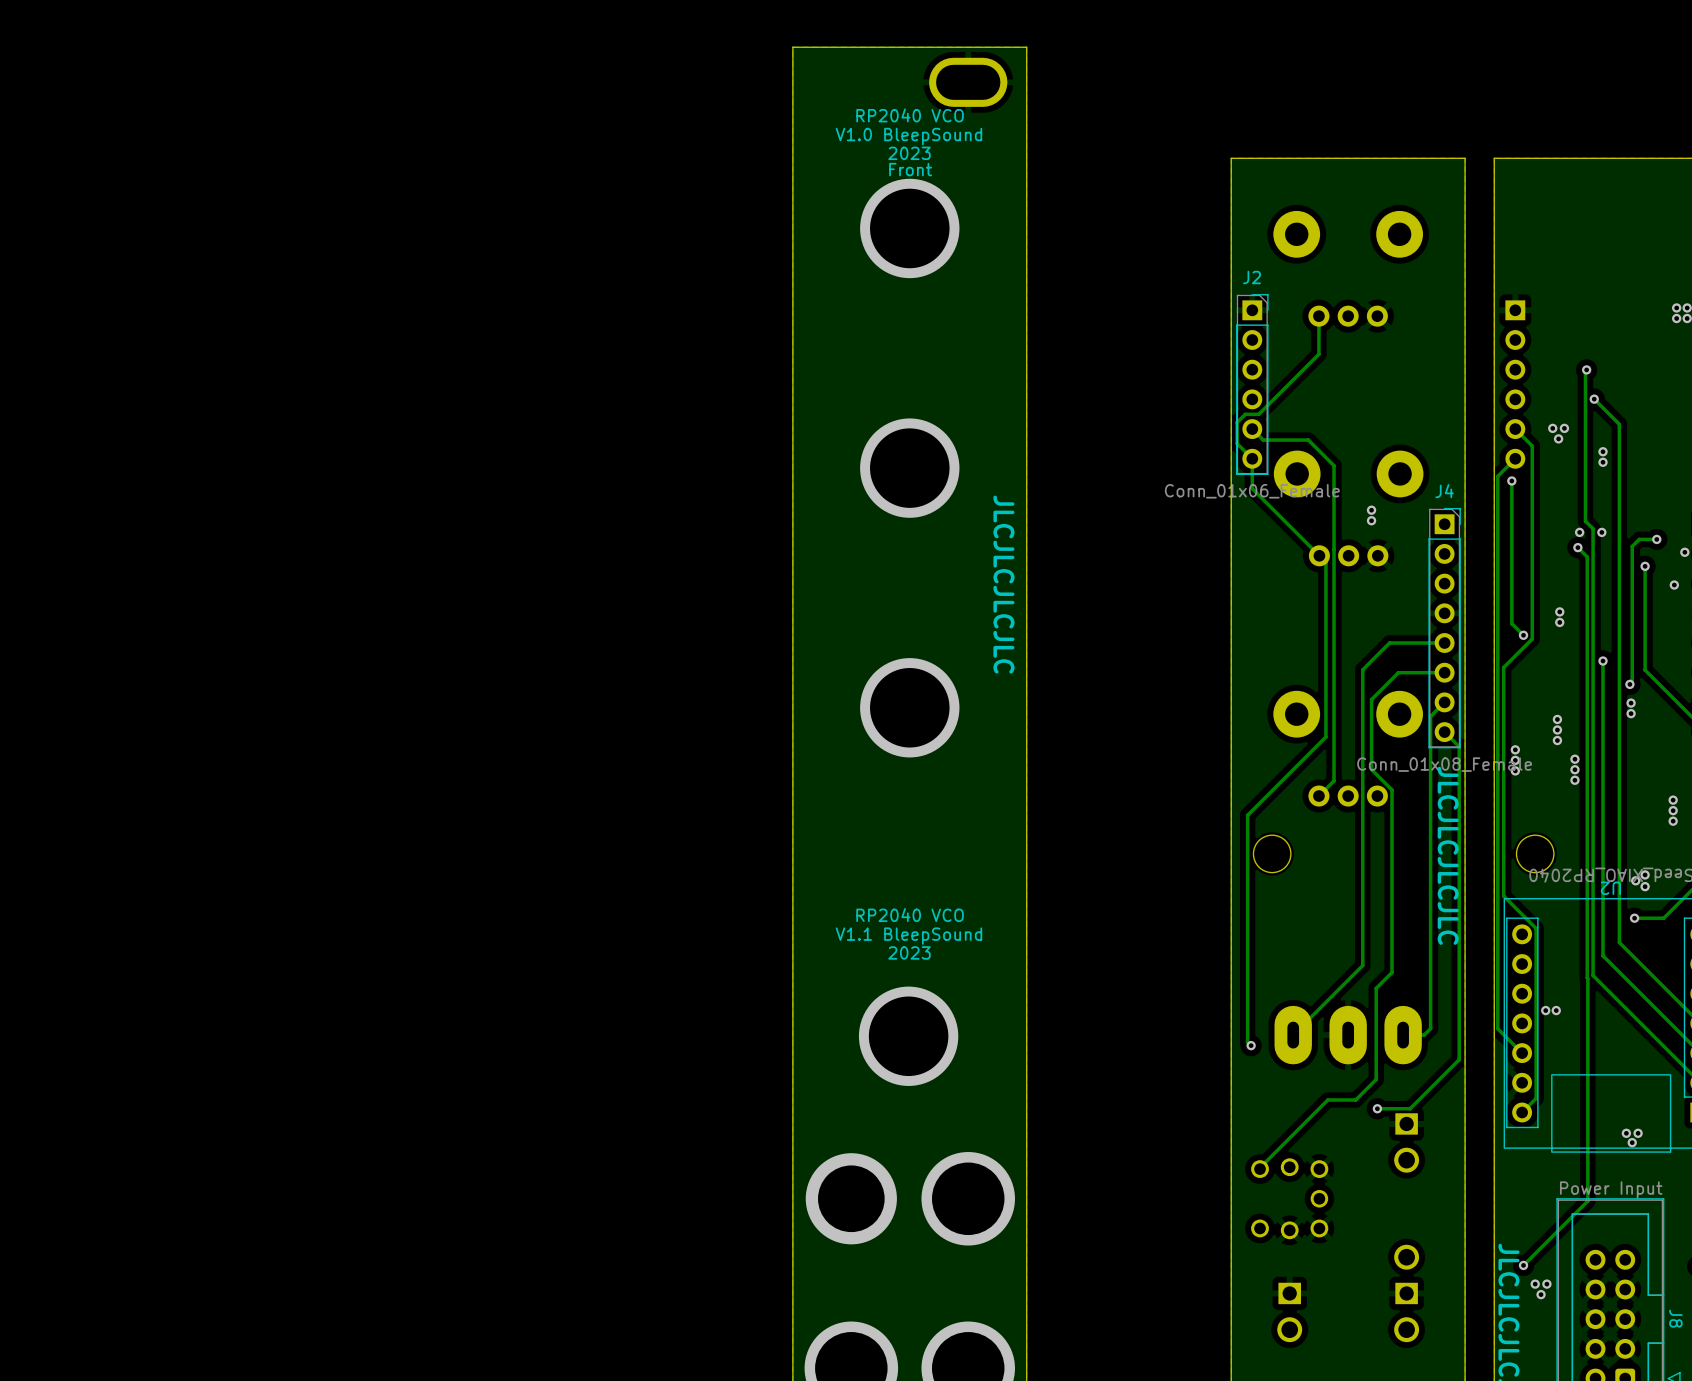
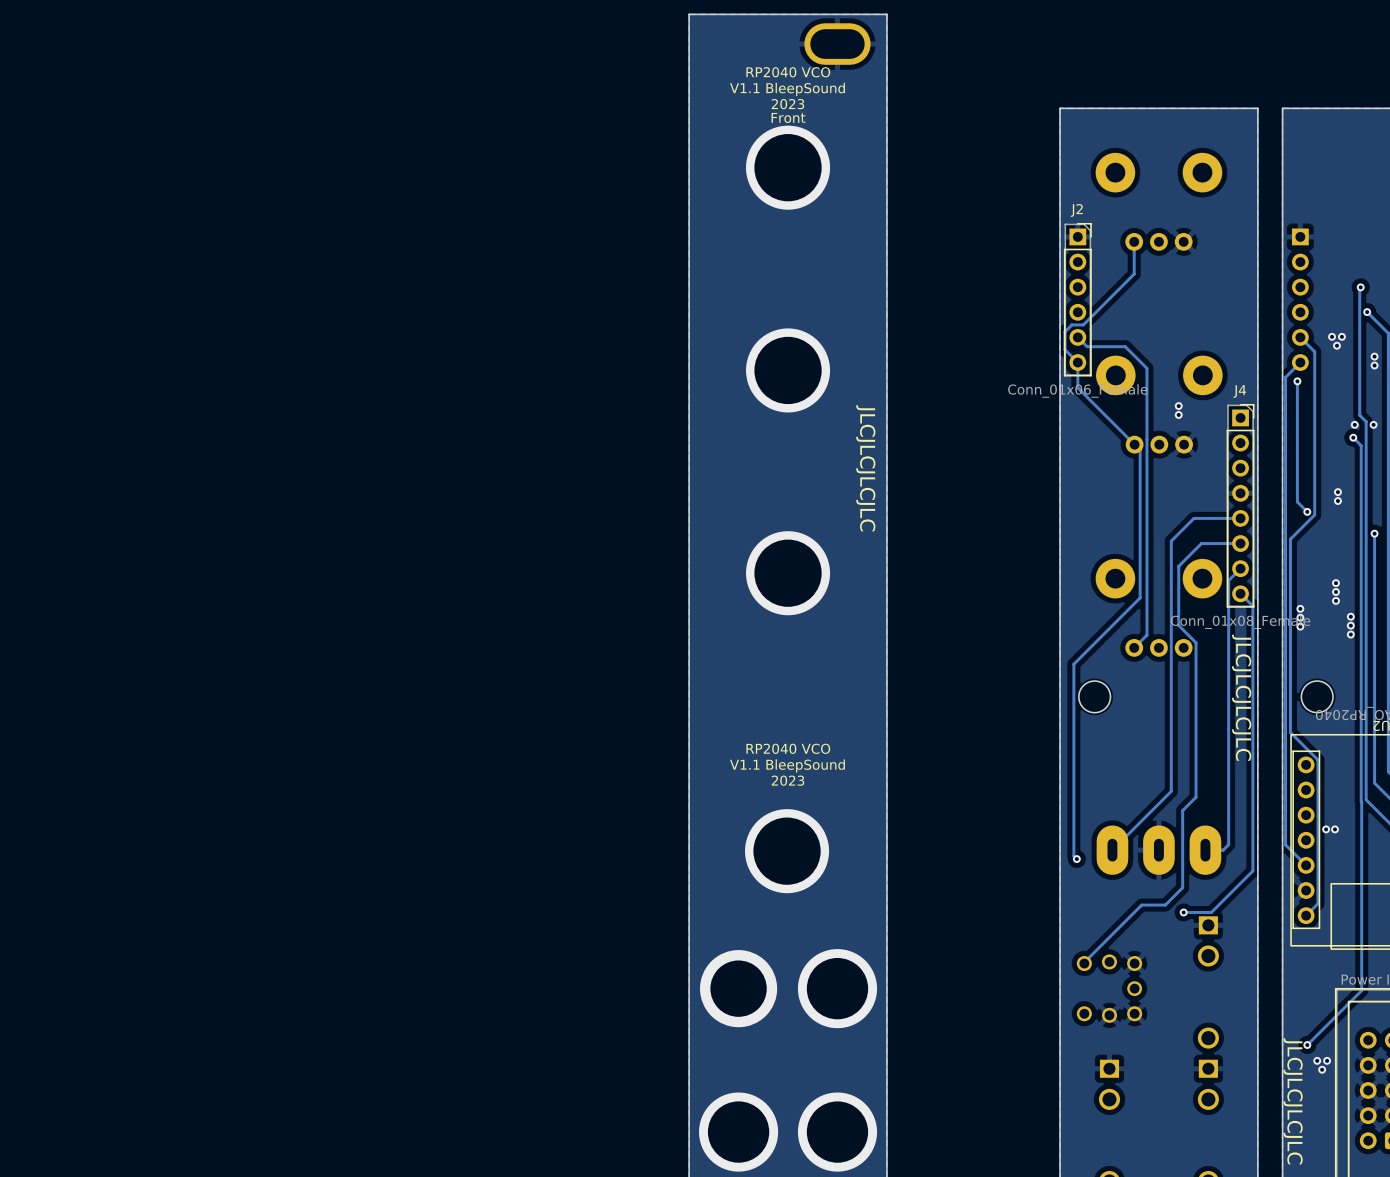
text: V1.0 BleepSound (908, 136) -> V1.1 BleepSound (787, 89)

